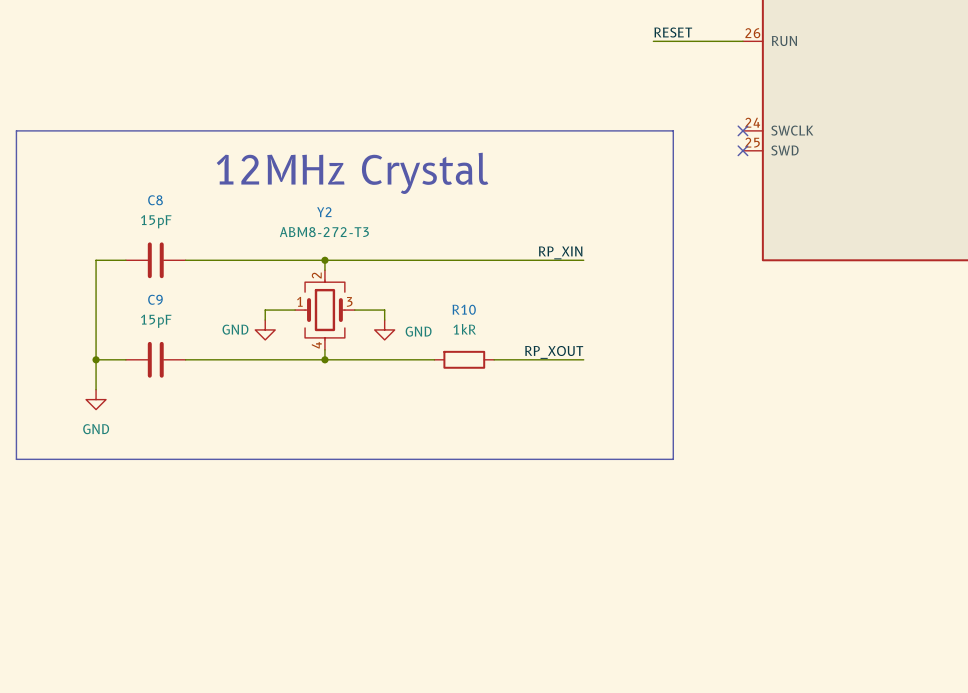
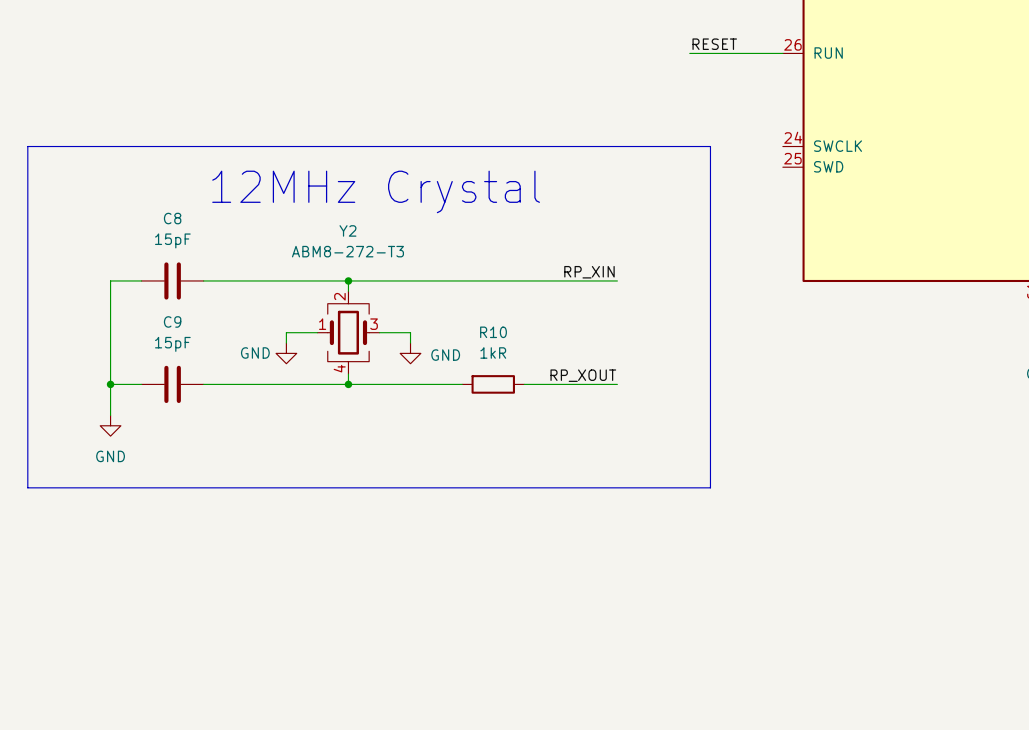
no-connect mark: (742, 130) -> none
no-connect mark: (742, 150) -> none

